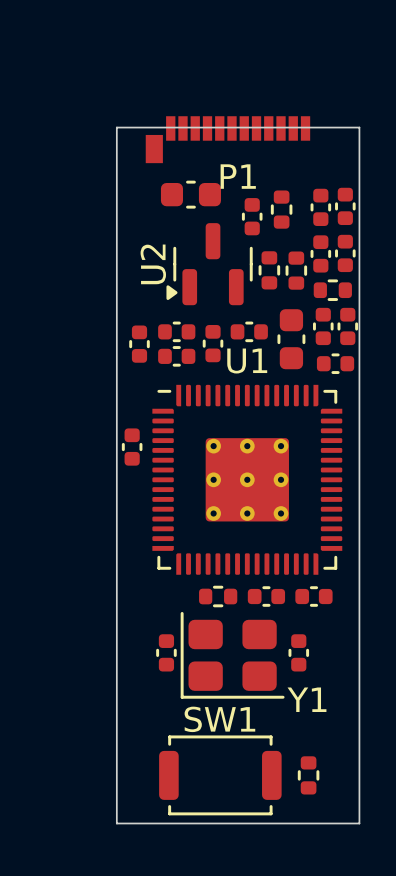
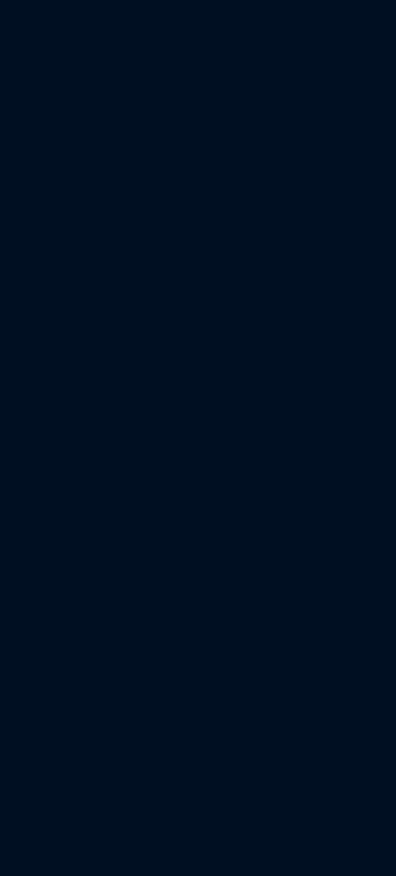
board edge: (116, 127) (359, 127) (359, 823) (116, 823) (116, 127) -> none
P1: (227, 139) -> none
part: (190, 194) -> none
part: (345, 206) -> none
part: (320, 207) -> none
part: (281, 209) -> none
part: (252, 216) -> none
part: (320, 253) -> none
part: (345, 253) -> none
U2: (209, 264) -> none
part: (269, 270) -> none
part: (296, 270) -> none
part: (332, 290) -> none
part: (323, 326) -> none
part: (347, 326) -> none
part: (176, 331) -> none
part: (249, 331) -> none
part: (291, 339) -> none
part: (213, 343) -> none
part: (139, 344) -> none
part: (176, 356) -> none
part: (335, 363) -> none
part: (132, 447) -> none
U1: (247, 479) -> none
part: (218, 596) -> none
part: (266, 596) -> none
part: (313, 596) -> none
part: (166, 652) -> none
part: (298, 652) -> none
Y1: (232, 655) -> none
SW1: (220, 775) -> none
part: (308, 775) -> none

